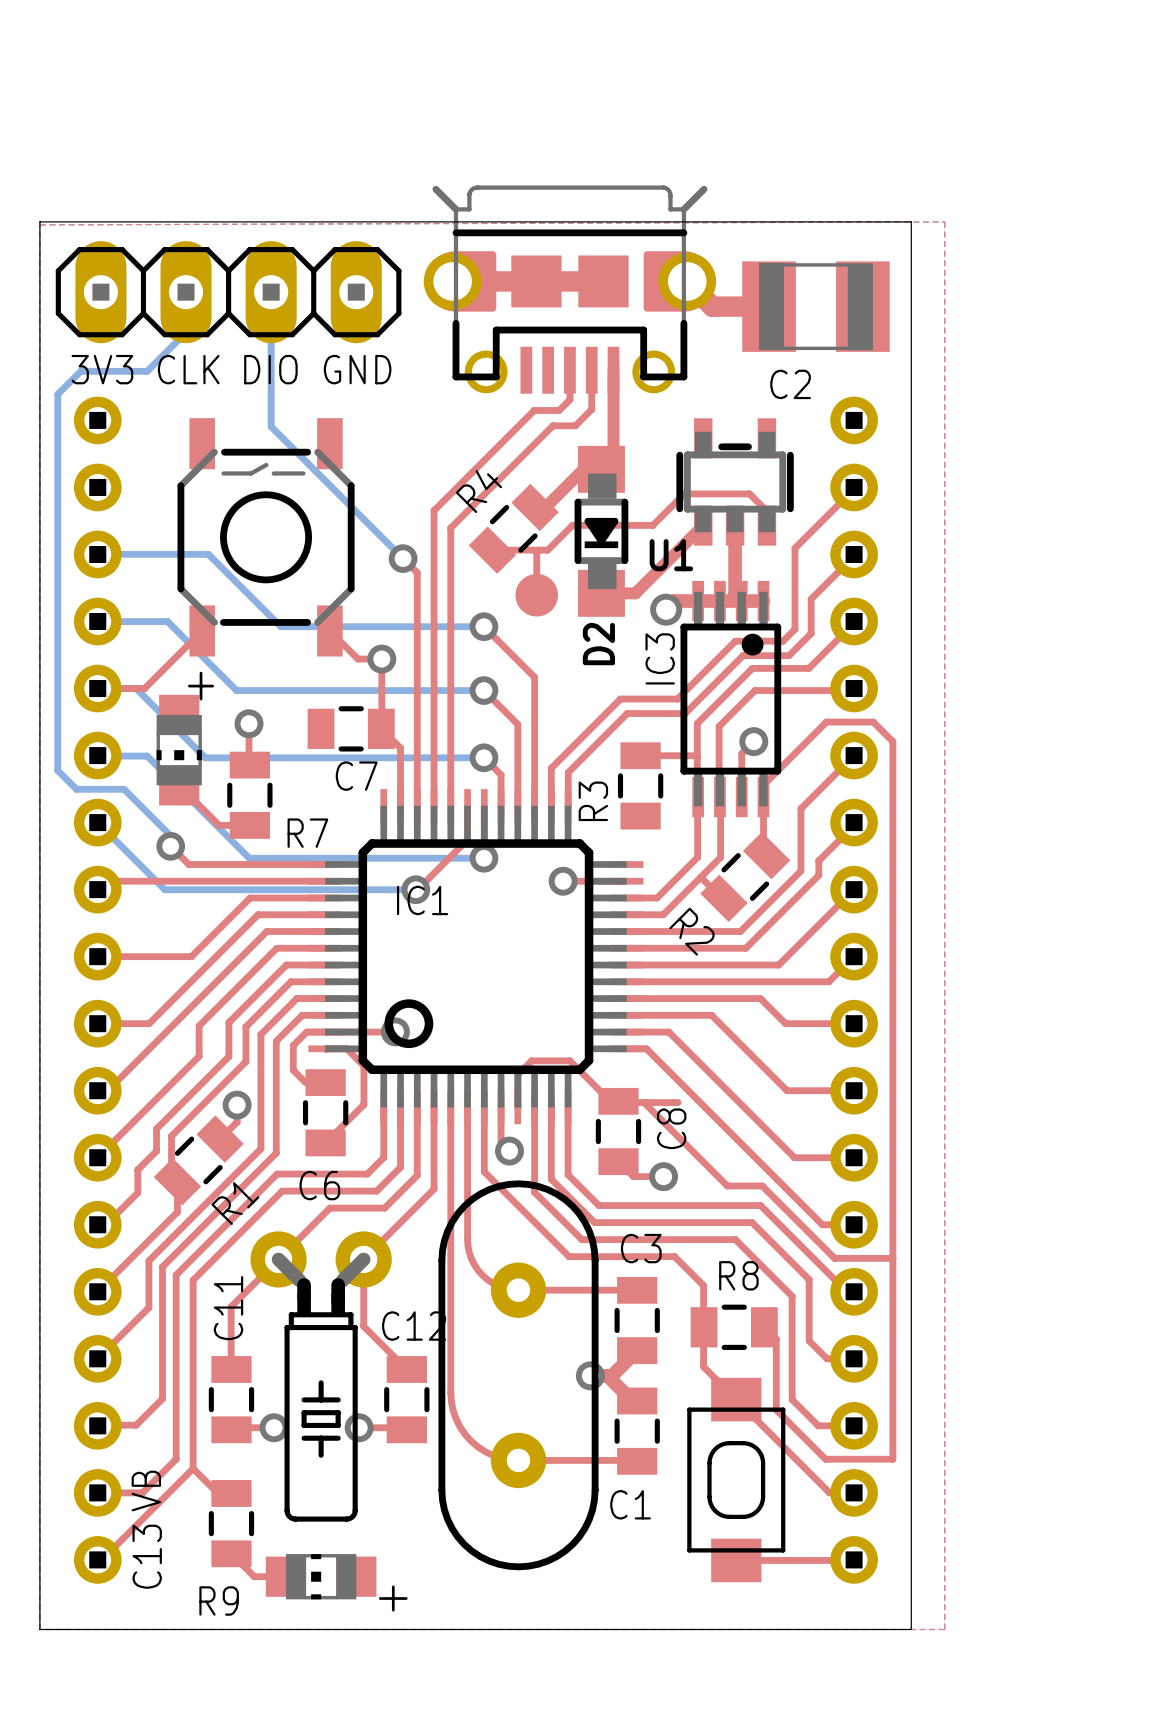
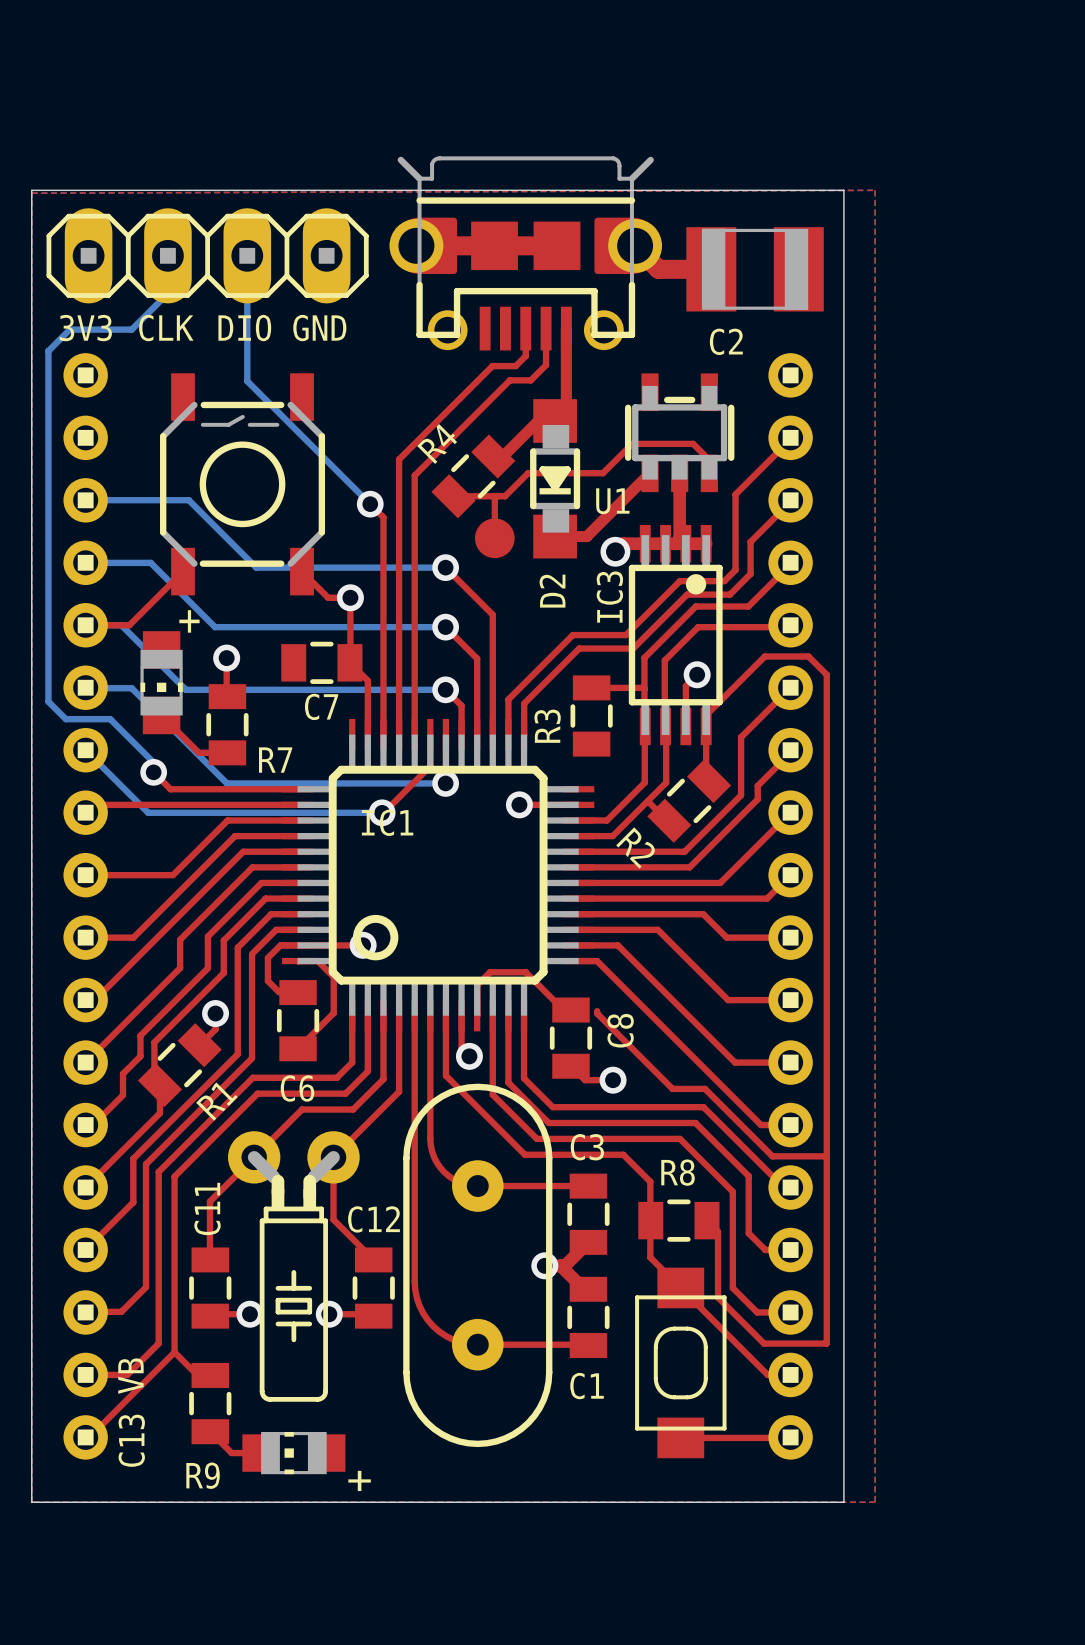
top track: (620, 1102) (678, 1102) -> none

